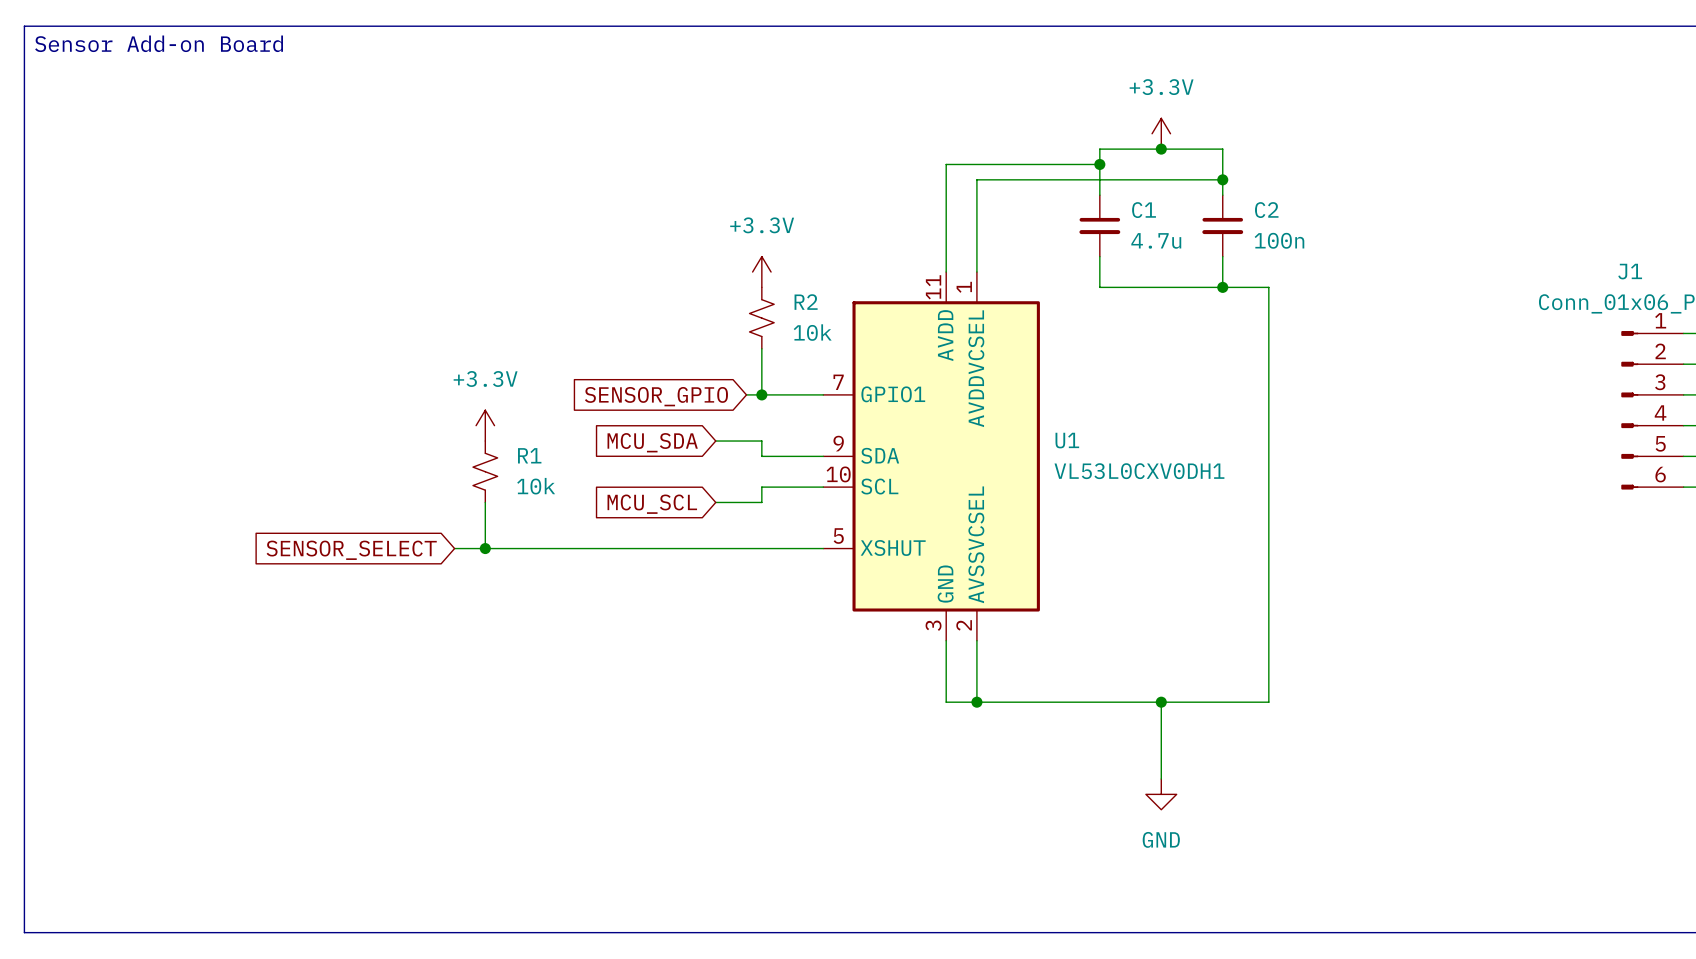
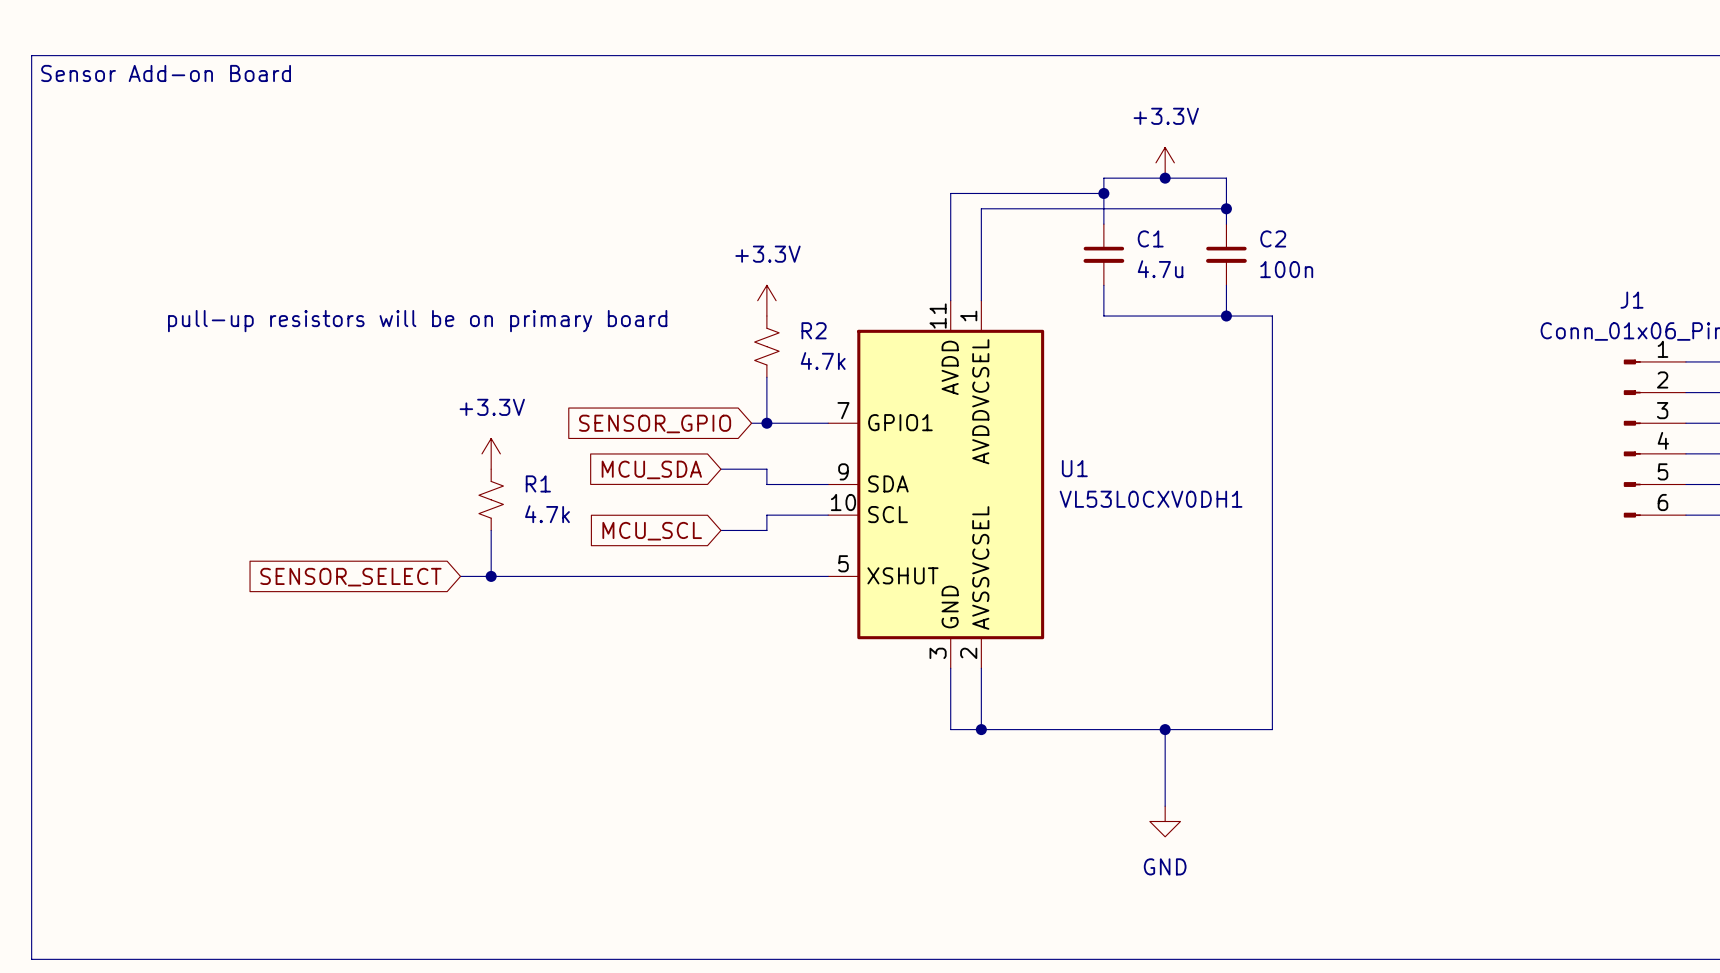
text: none -> pull-up resistors will be on primary board (417, 321)
R2 value: 10k (812, 332) -> 4.7k (823, 361)
R1 value: 10k (536, 486) -> 4.7k (547, 514)

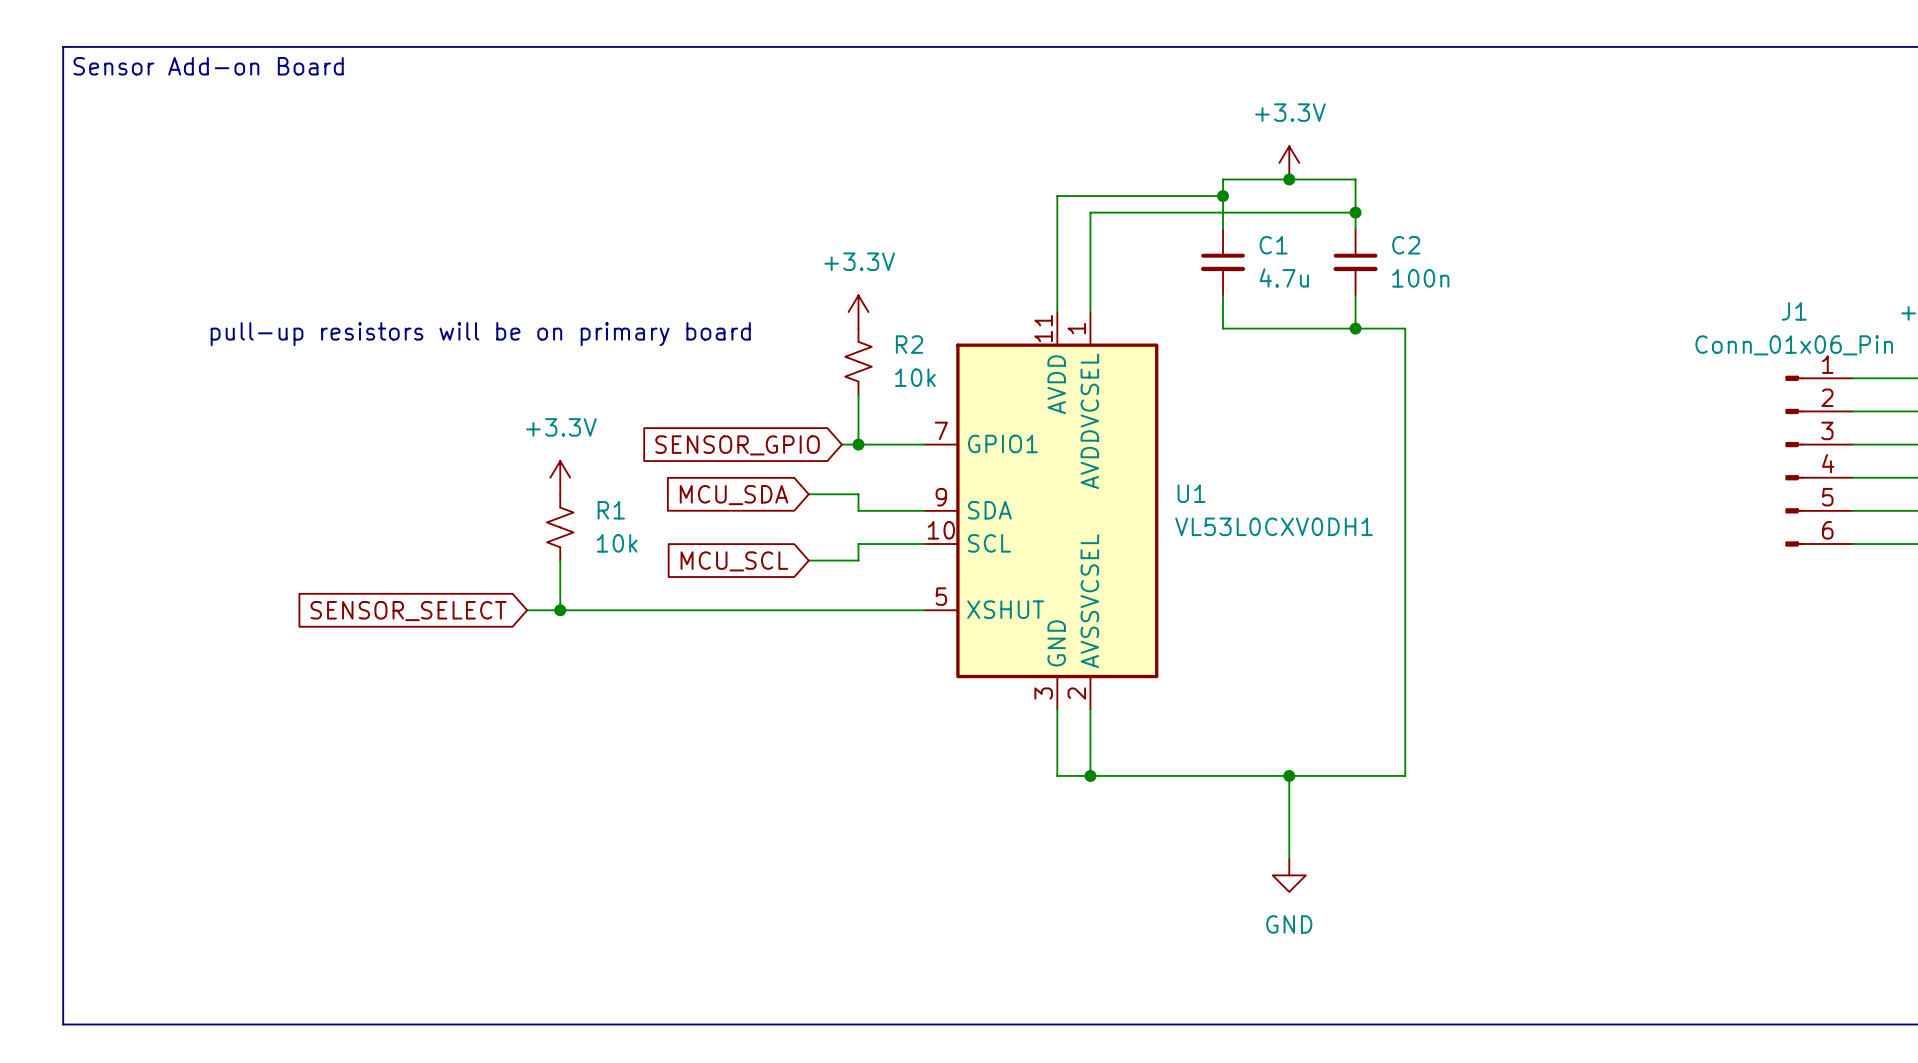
R2 value: 4.7k (823, 361) -> 10k (915, 377)
R1 value: 4.7k (547, 514) -> 10k (617, 543)

